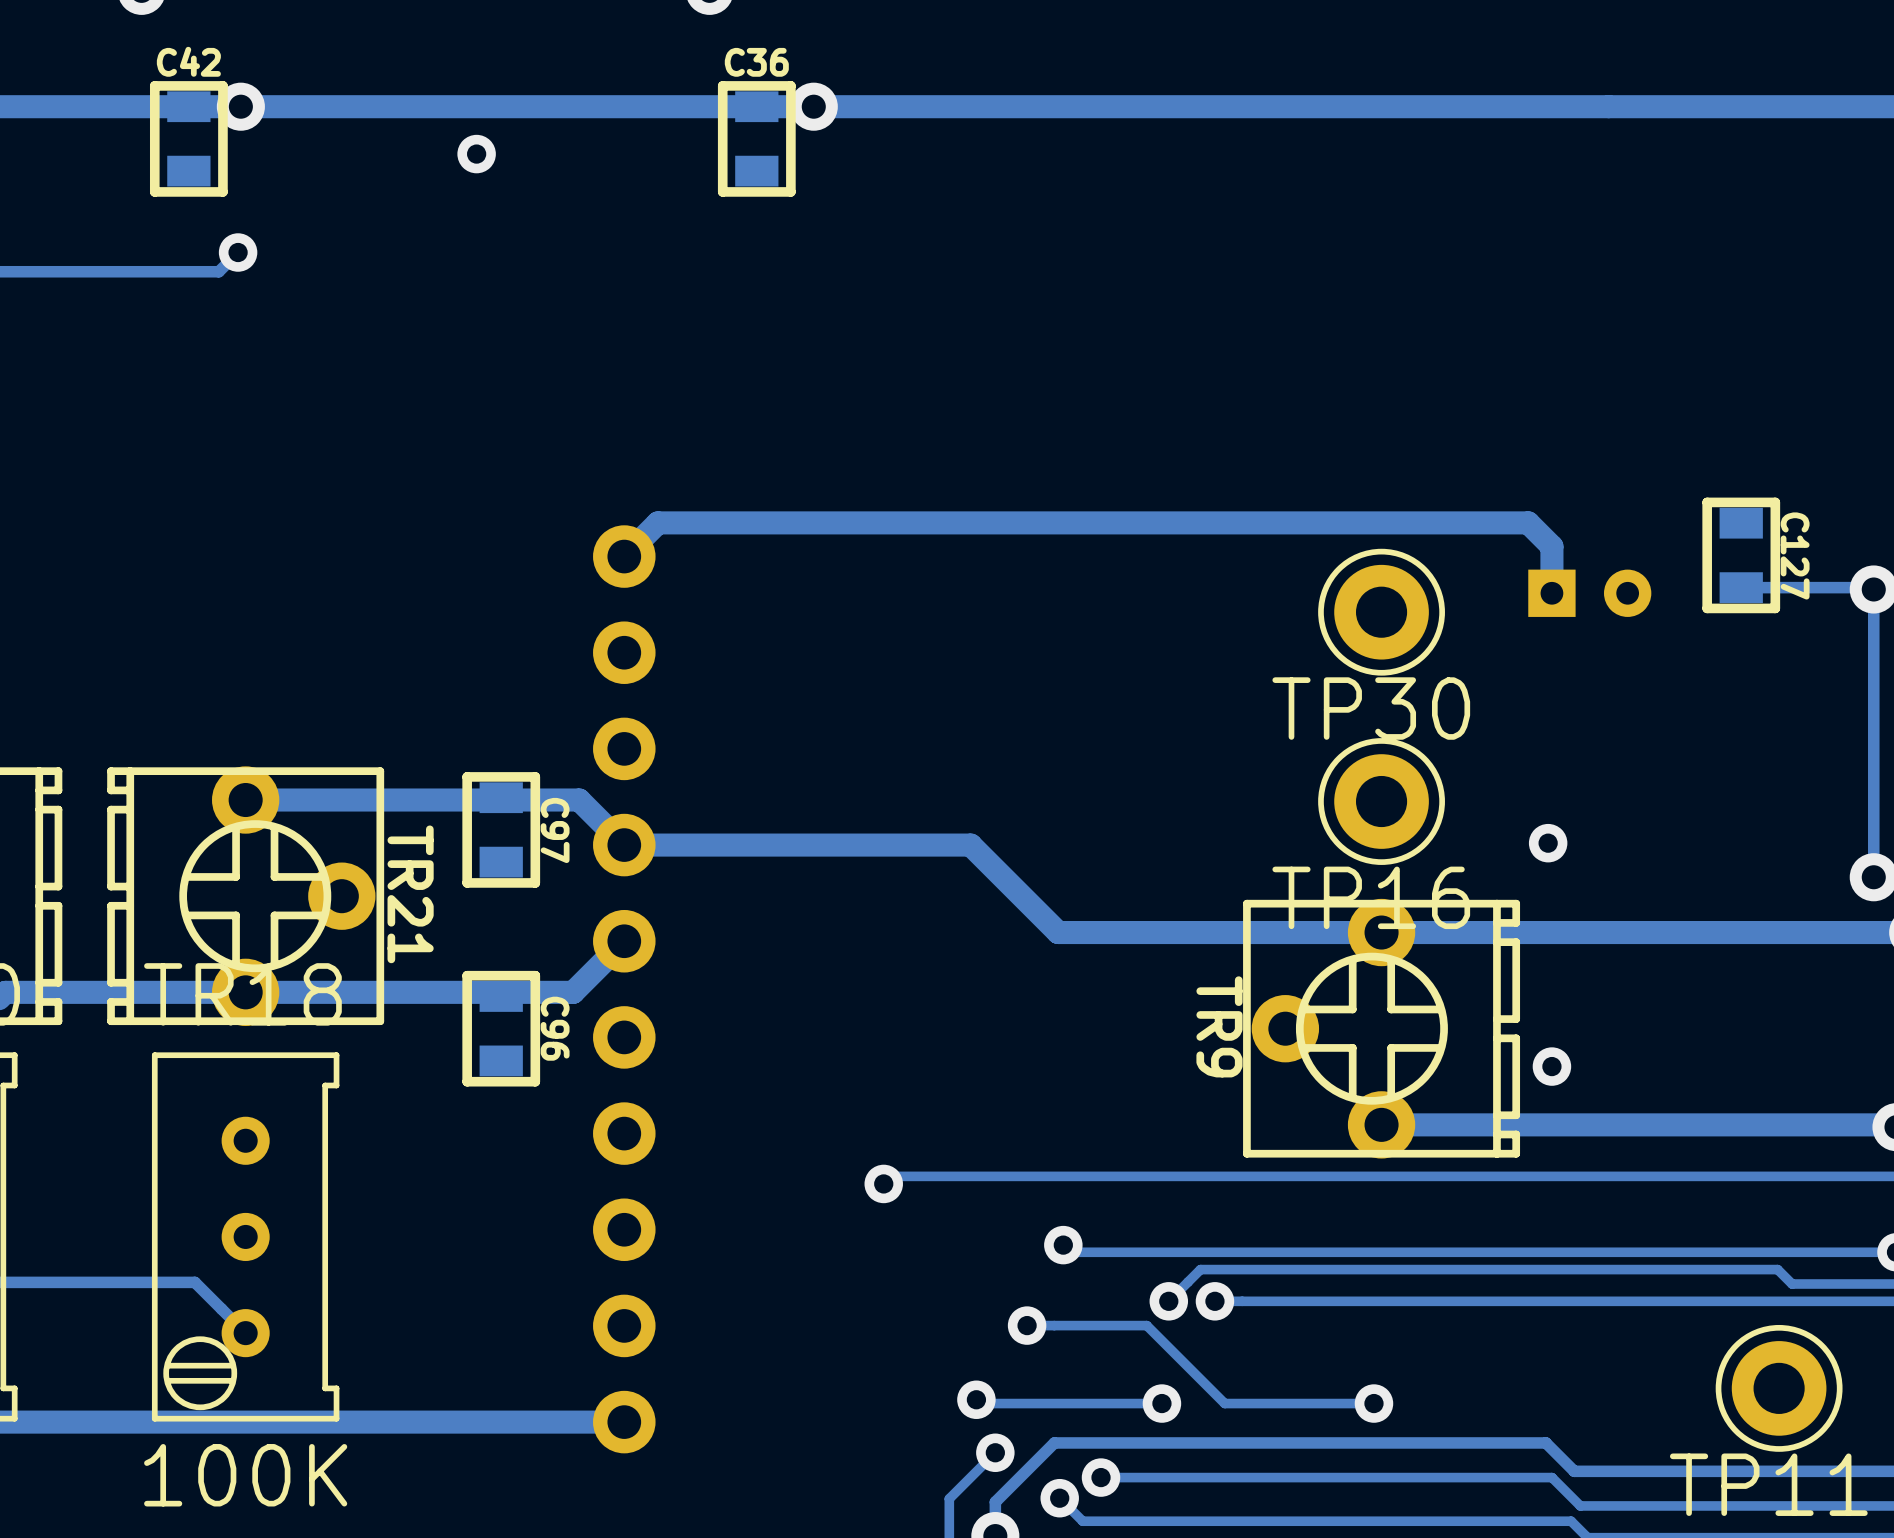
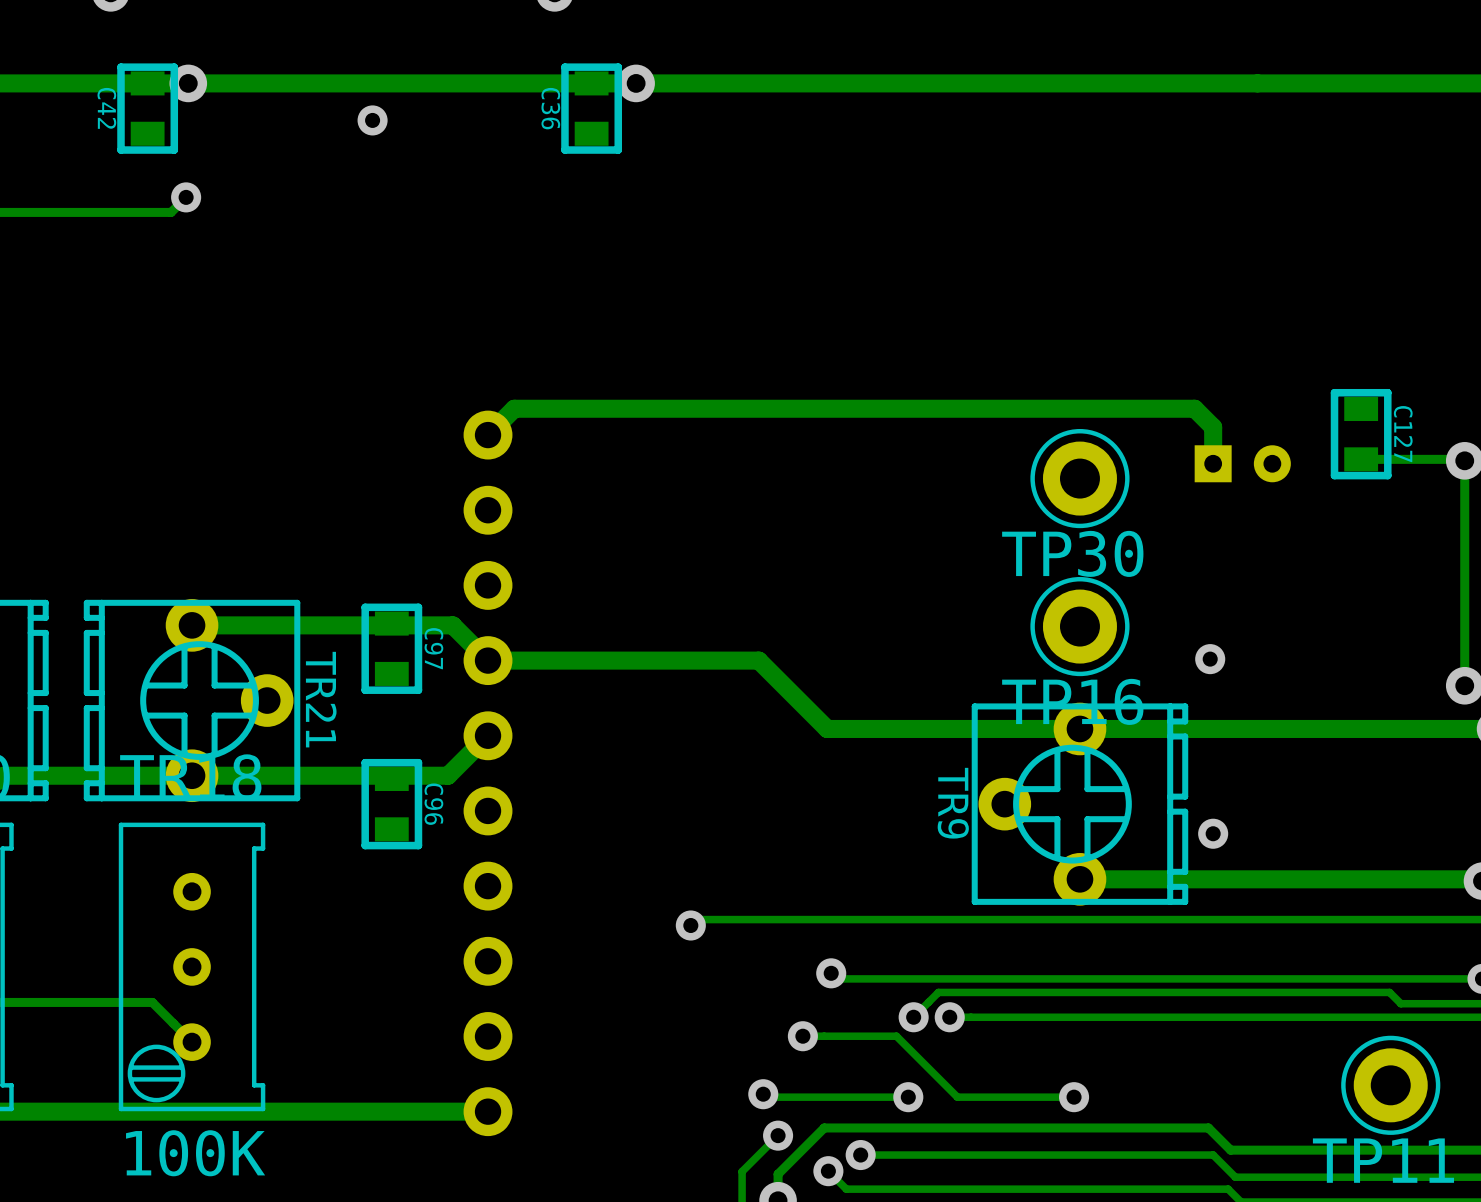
C42 name rotation: 0° (188, 61) -> 90° clockwise (106, 108)
C42 name position: C42 (188, 61) -> C42 (106, 108)
C36 name rotation: 0° (756, 62) -> 90° clockwise (550, 108)
C36 name position: C36 (756, 62) -> C36 (550, 108)

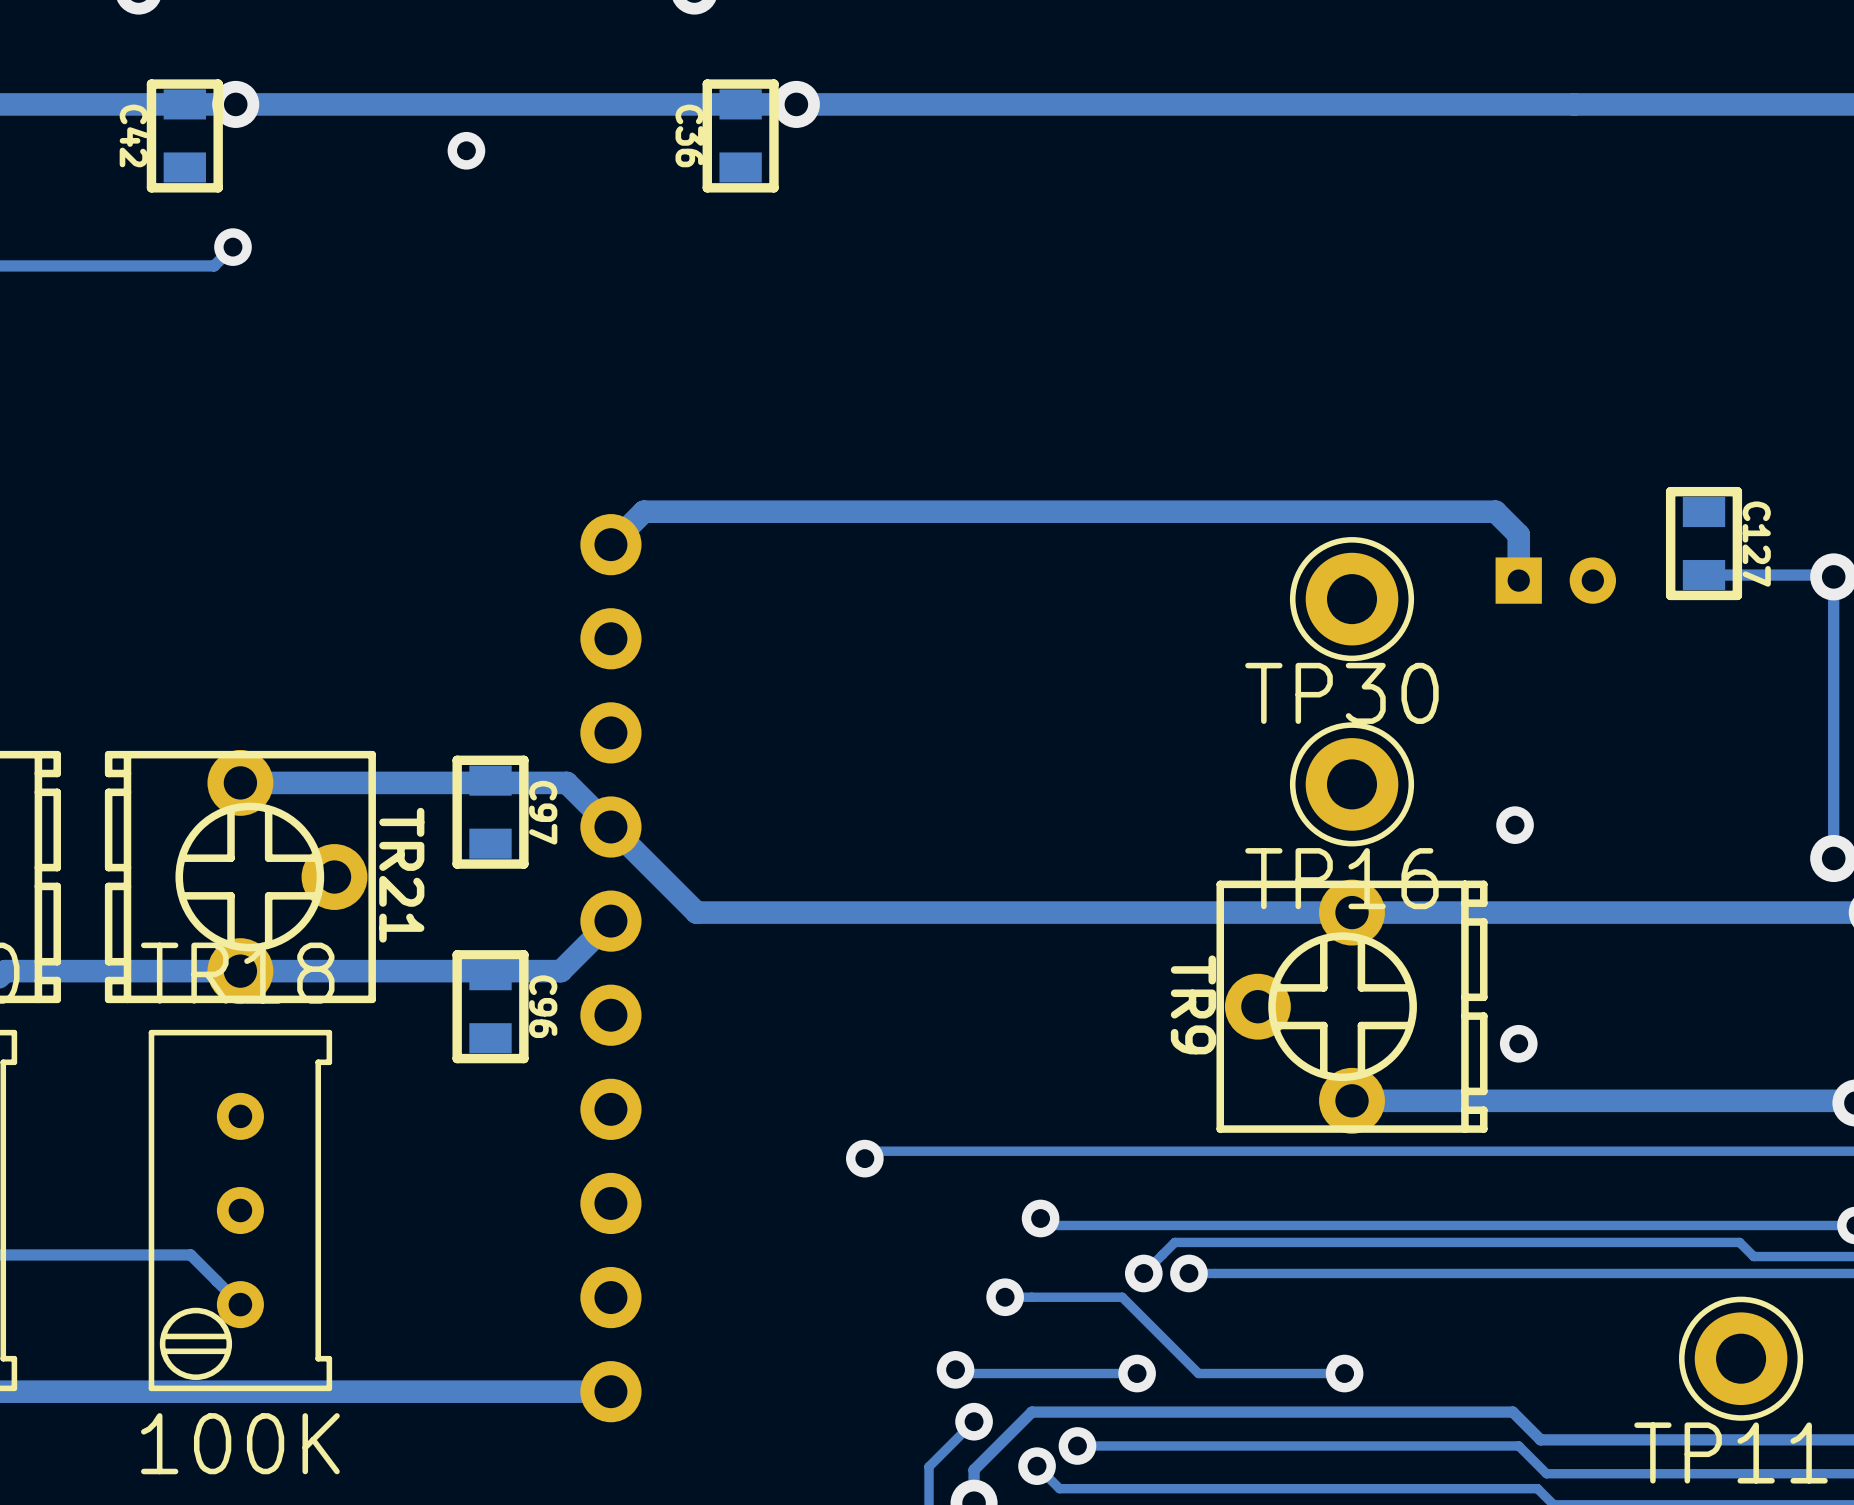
track: (488, 660) (758, 660) (827, 728) -> (610, 826) (696, 912) (1035, 912)

